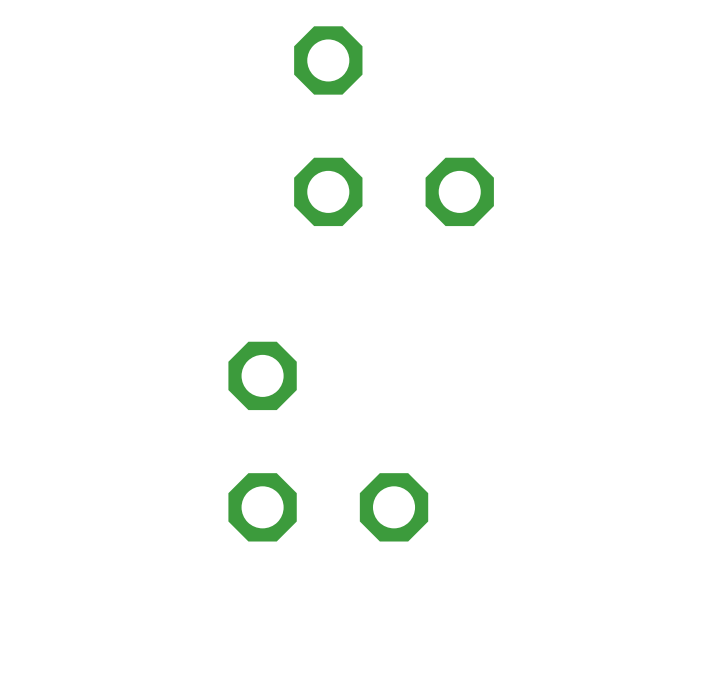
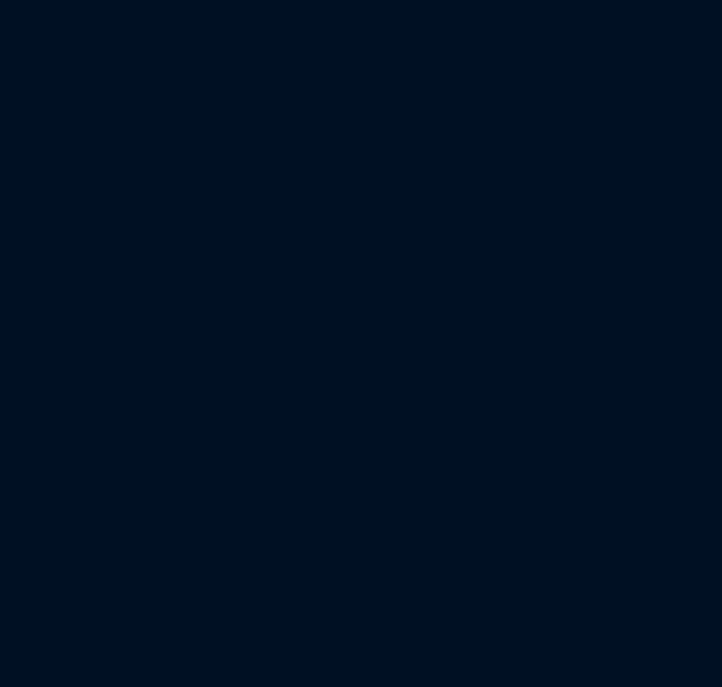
part: (394, 126) -> none
part: (328, 441) -> none

